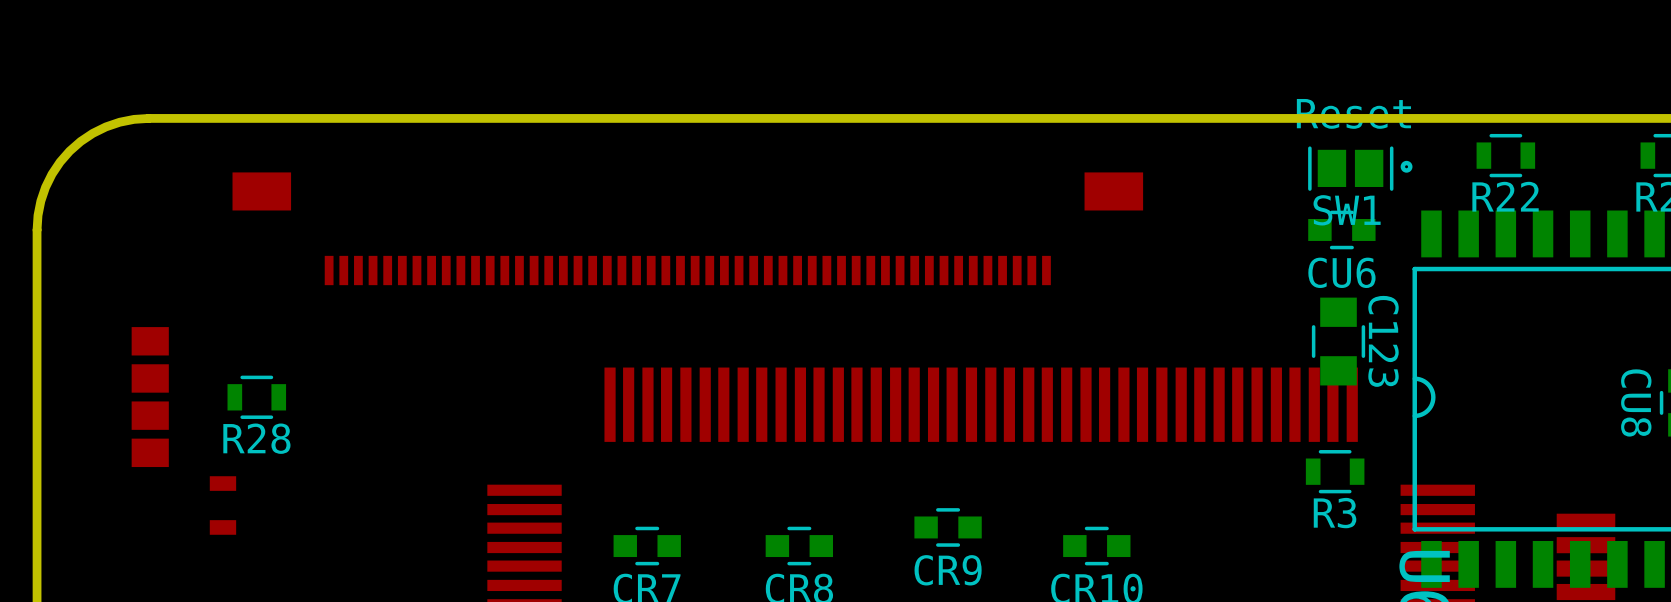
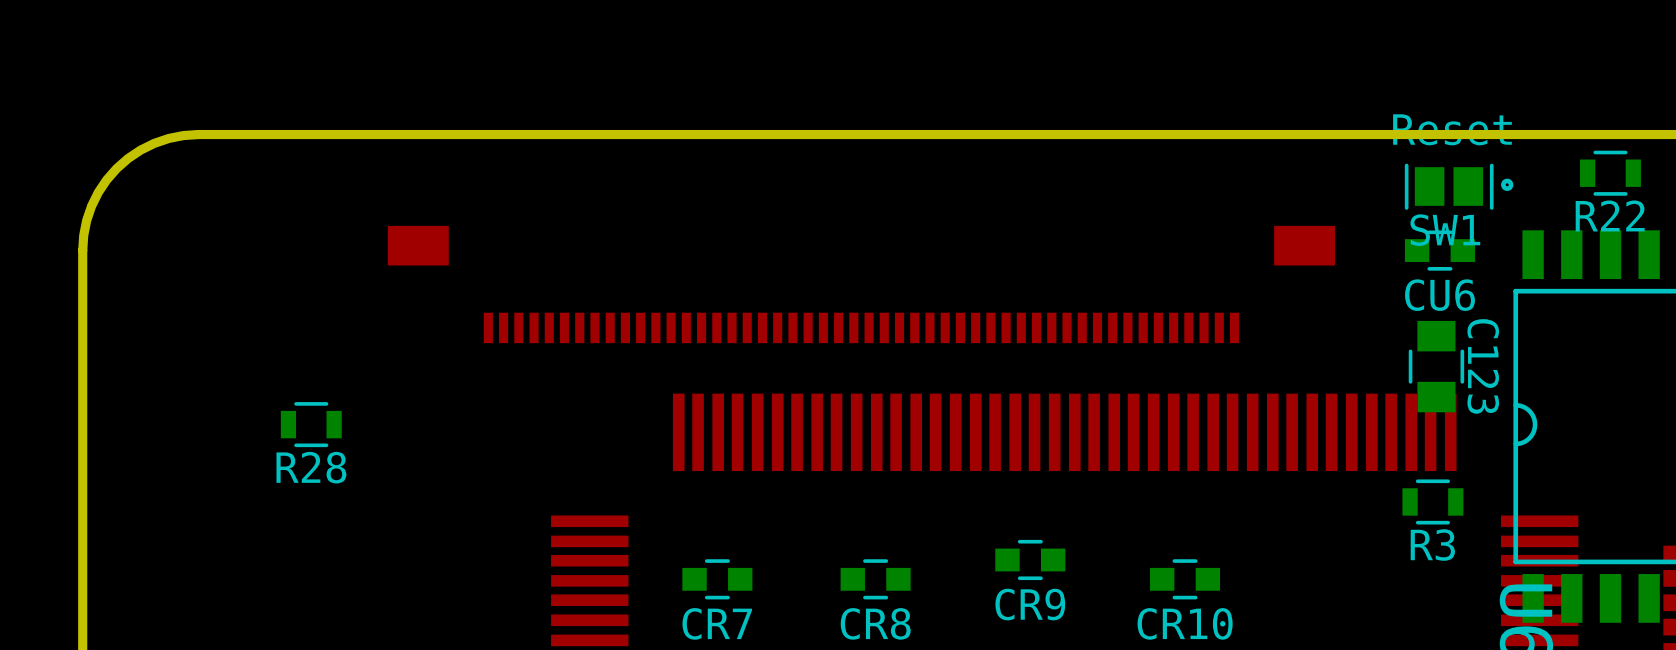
part position: (687, 228) -> (861, 284)
part: (150, 397) -> none
part: (222, 505) -> none

